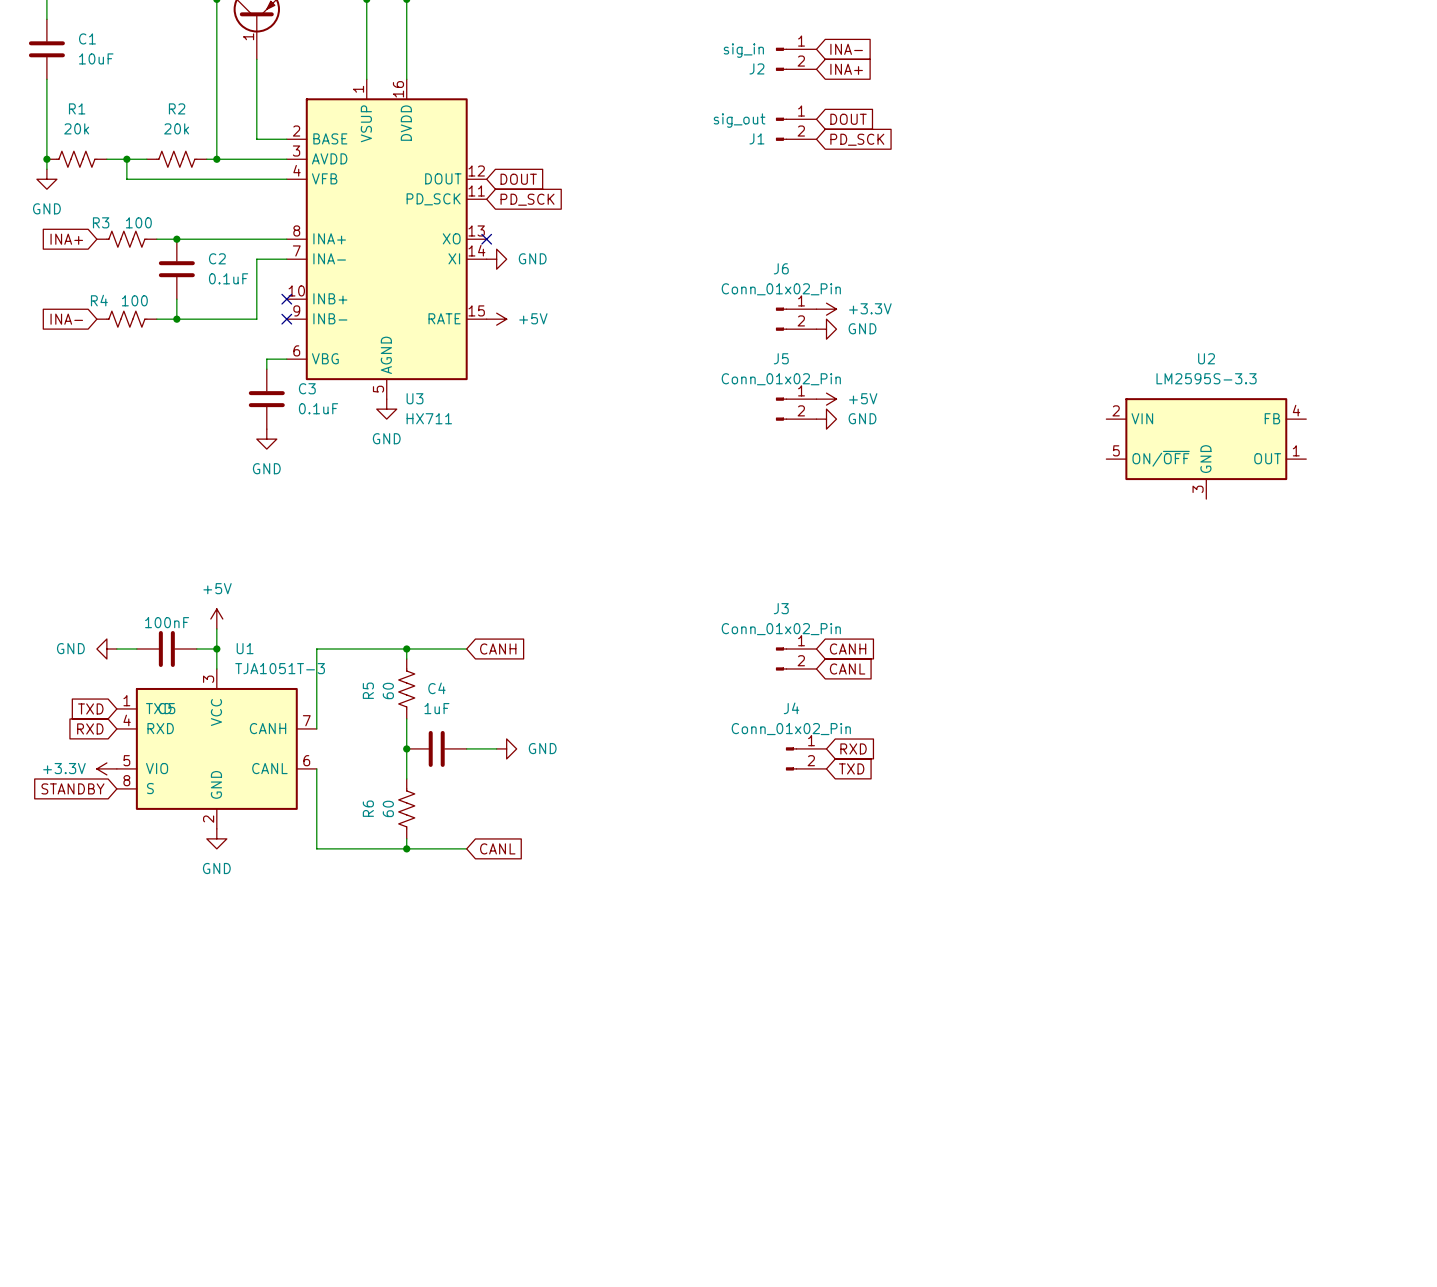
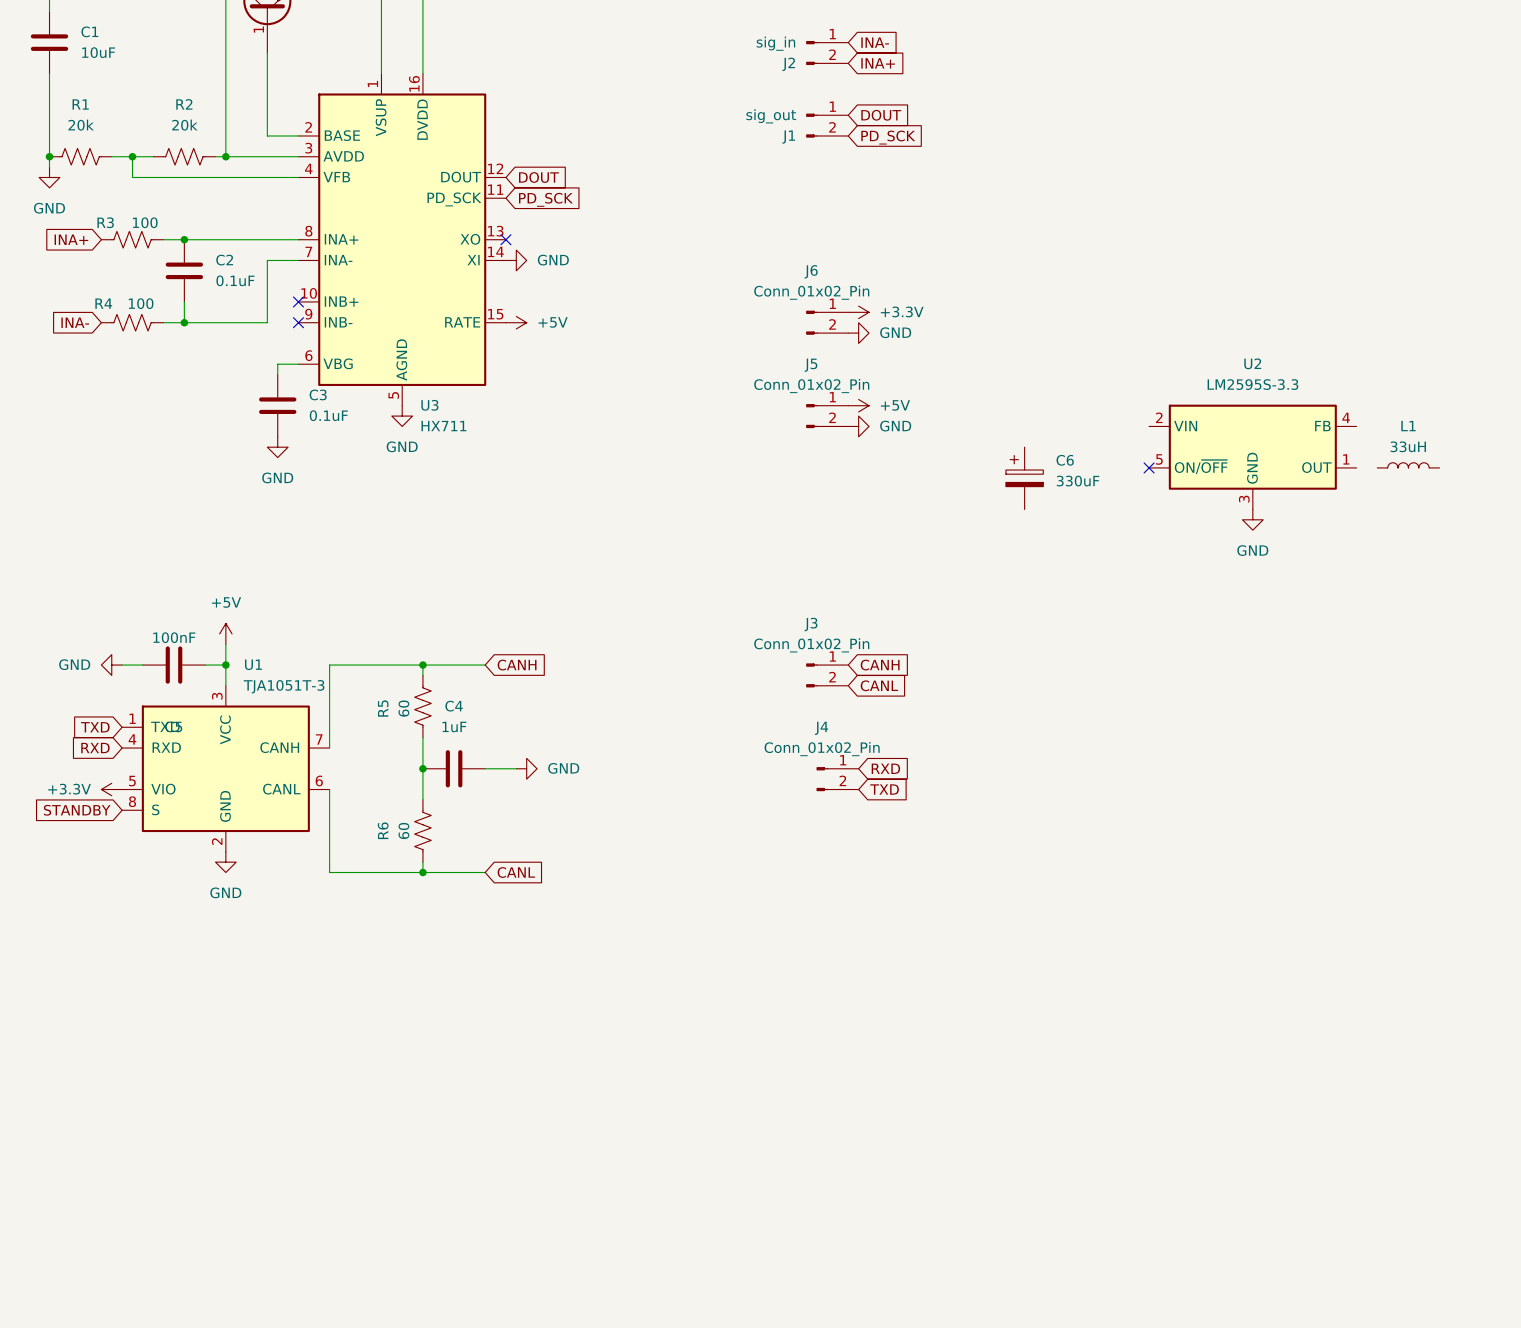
L1: none -> 33uH (1408, 465)
no-connect mark: none -> (1149, 467)
C6: none -> 330uF (1024, 478)
power symbol: none -> GND (1252, 519)

